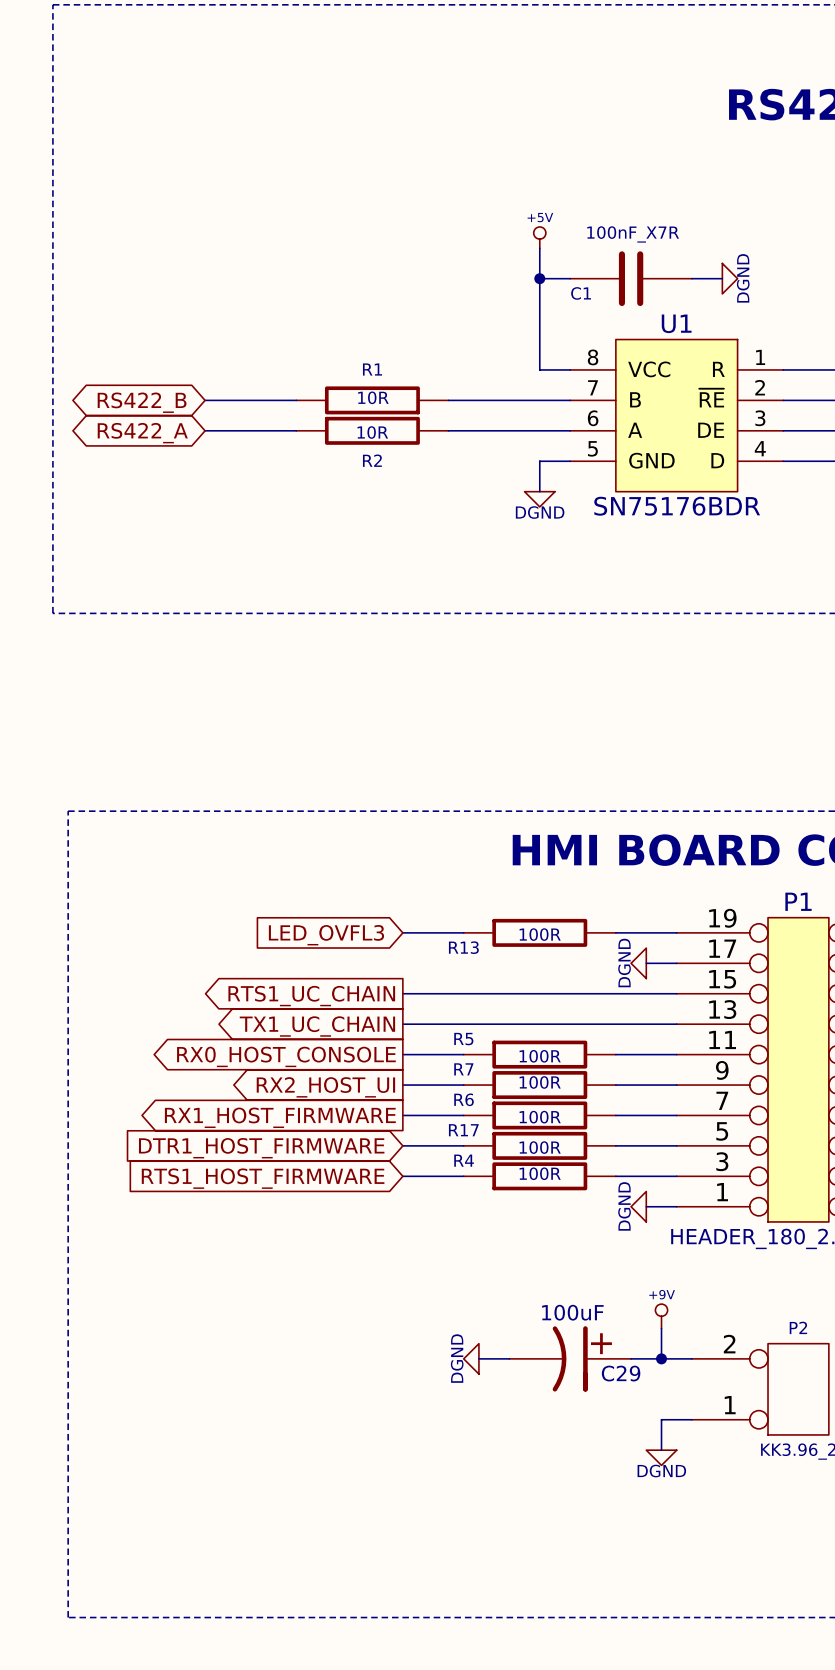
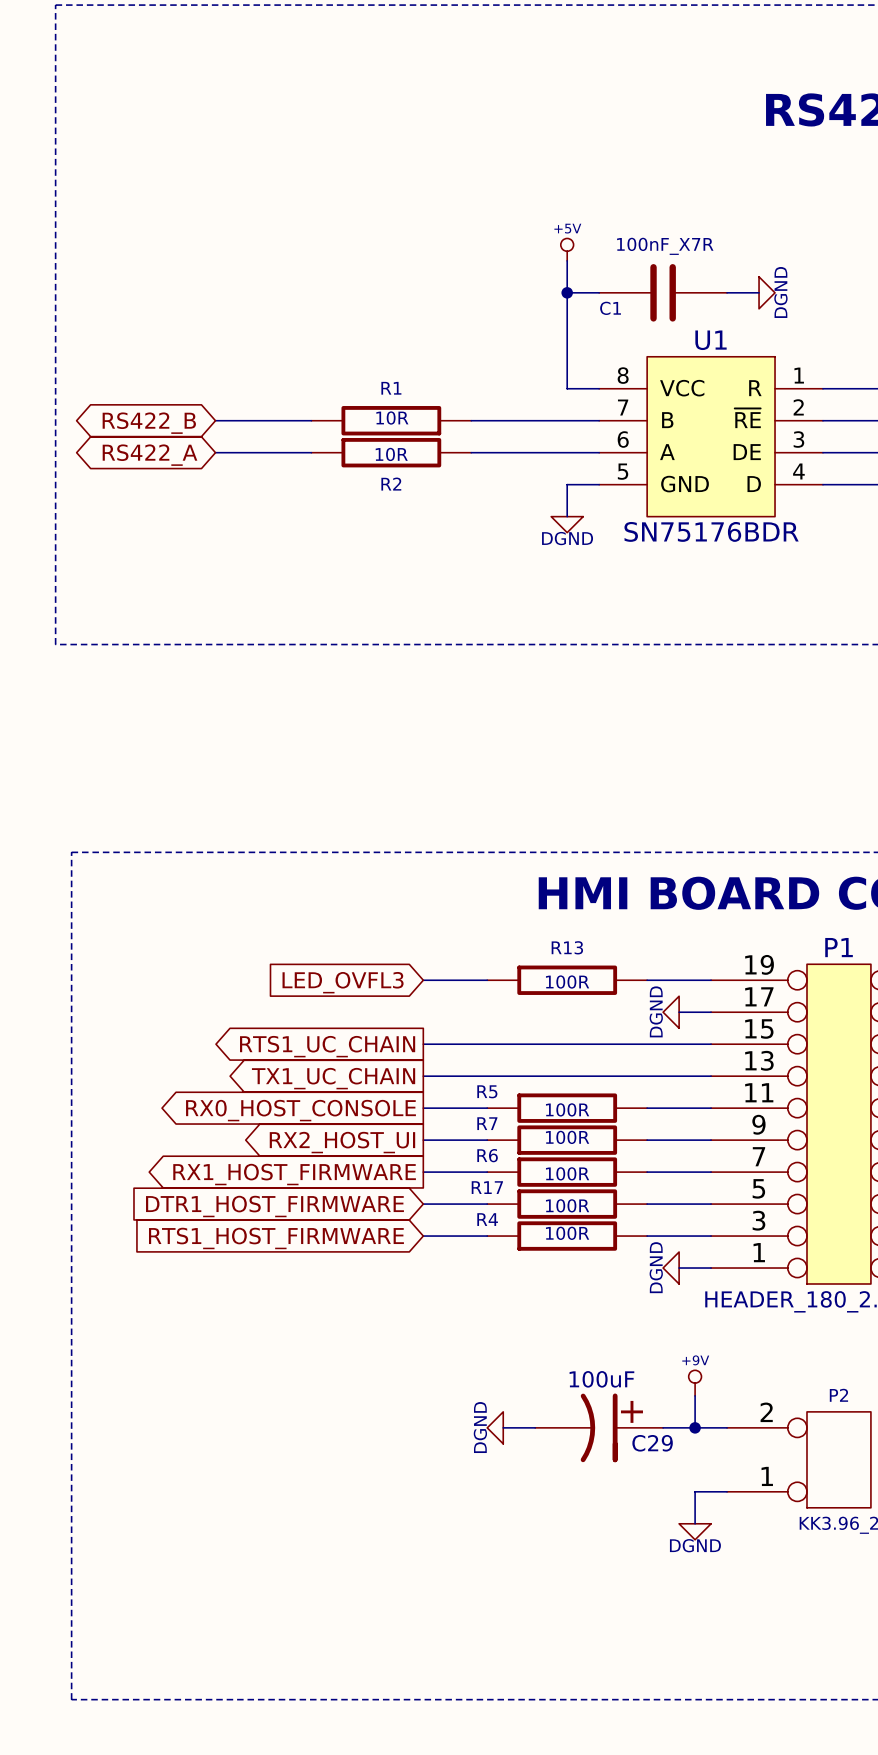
R13 name position: R13 (463, 947) -> R13 (567, 947)

